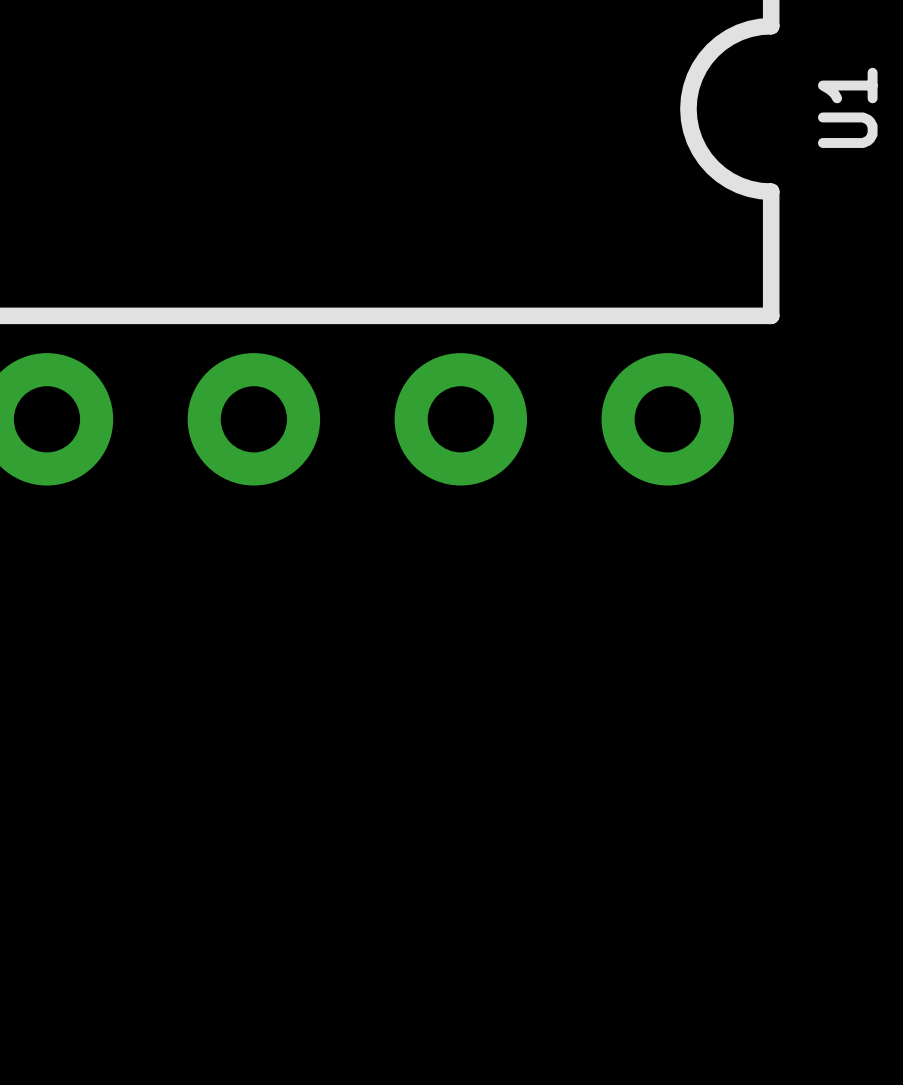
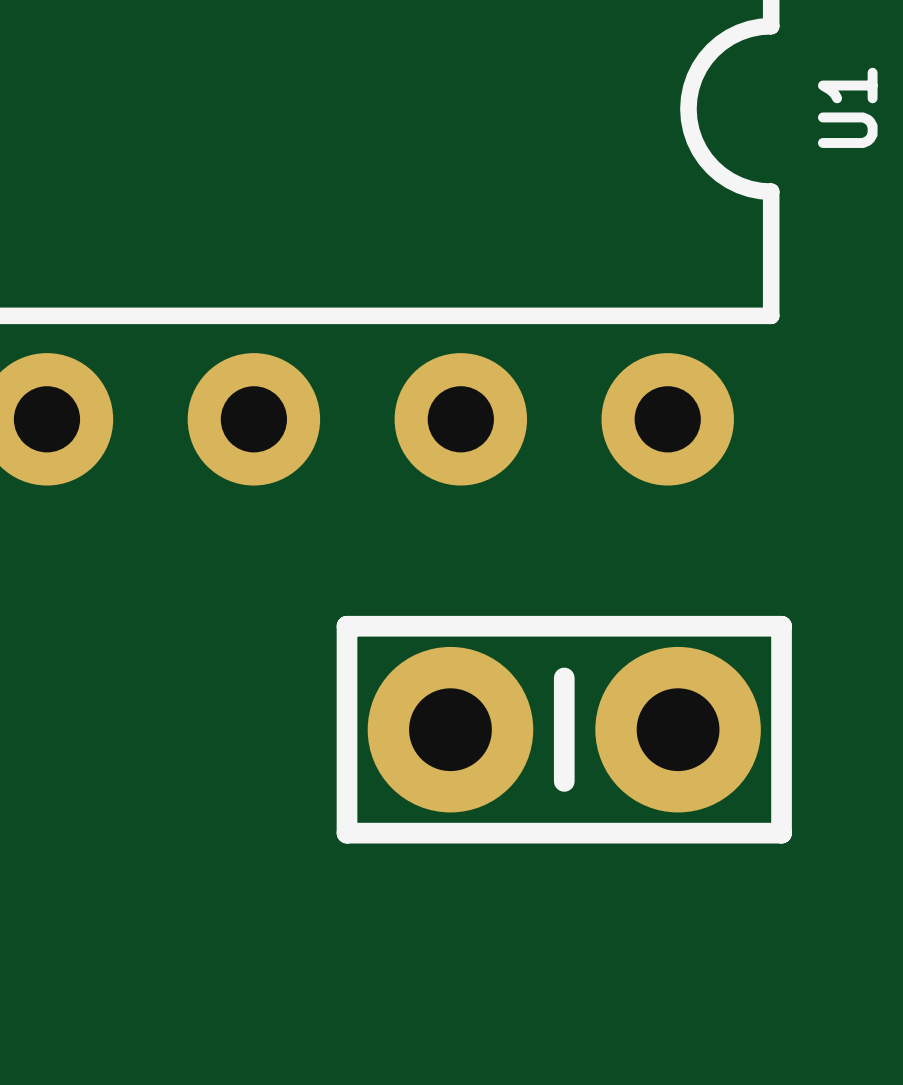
part: none -> (564, 729)

